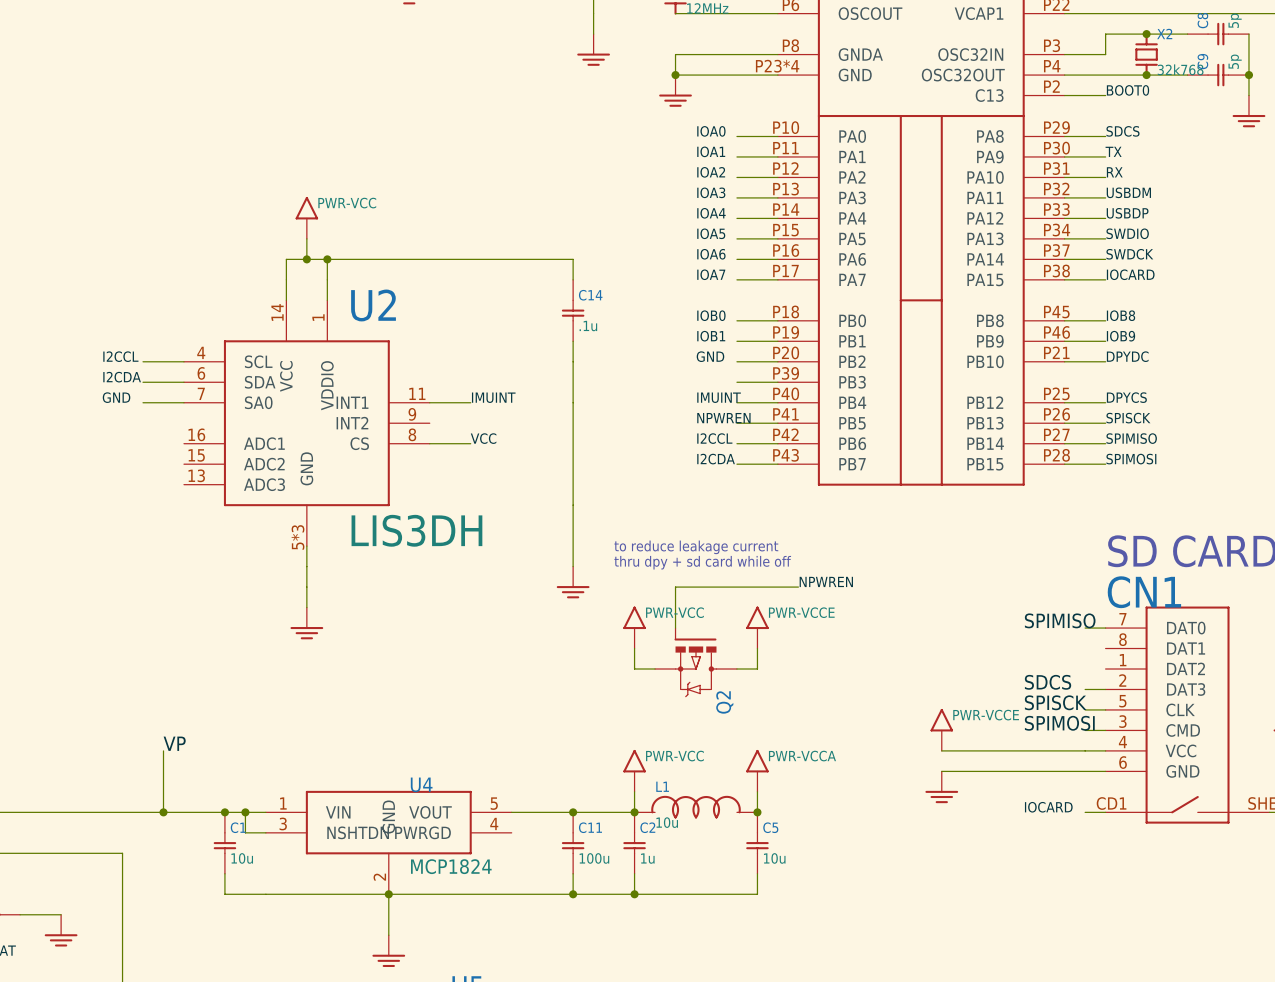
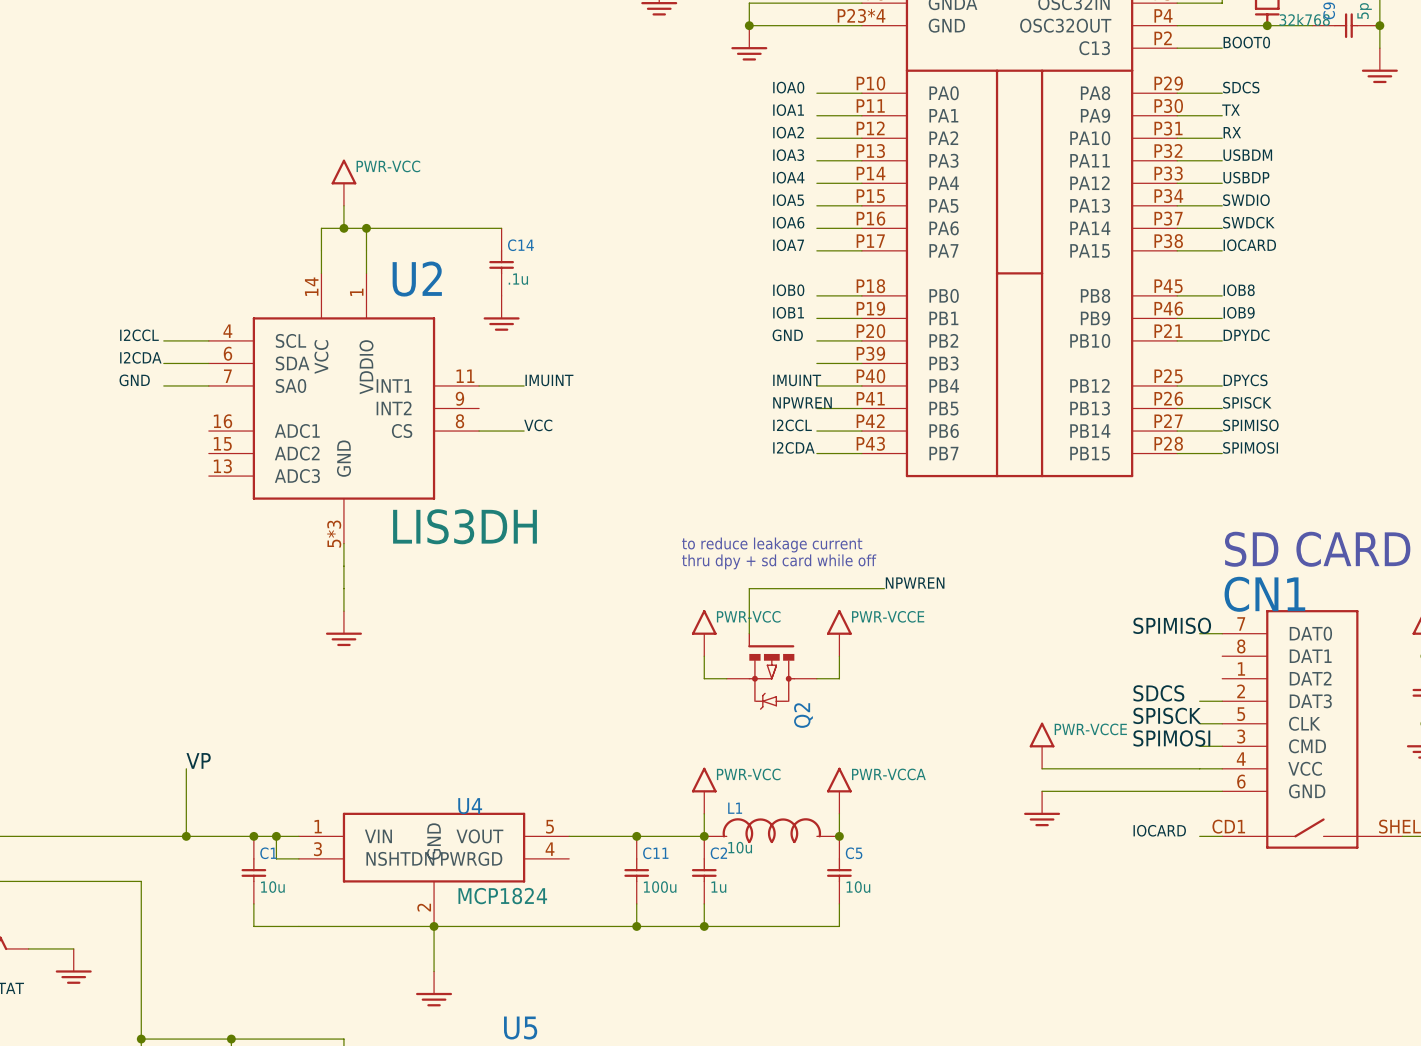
wire: (450, 259) (573, 259) (573, 279) -> none
C14 position: (573, 310) -> (501, 262)
power symbol: none -> (501, 313)
wire: (573, 341) (573, 566) -> none
power symbol: (573, 582) -> none

